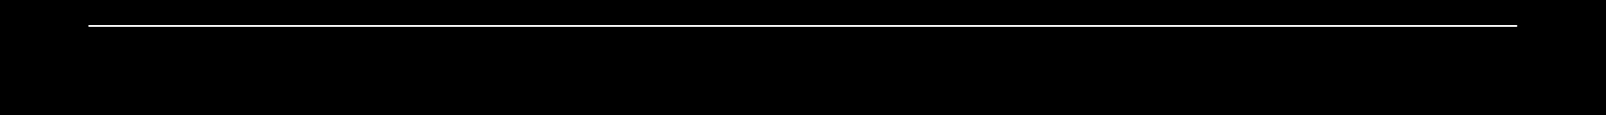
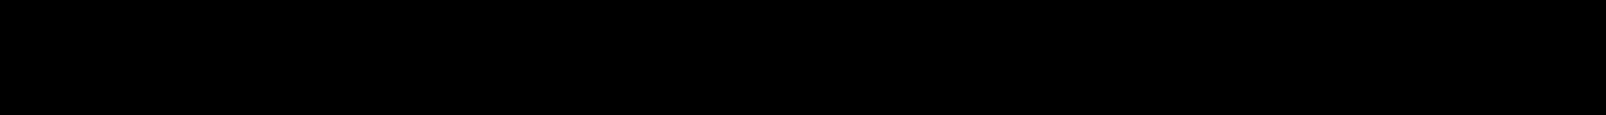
board edge: (89, 25) (1516, 25) -> none

